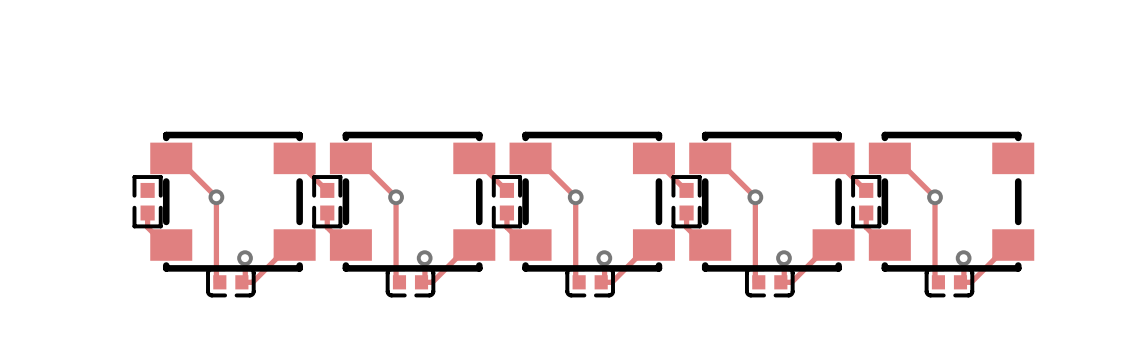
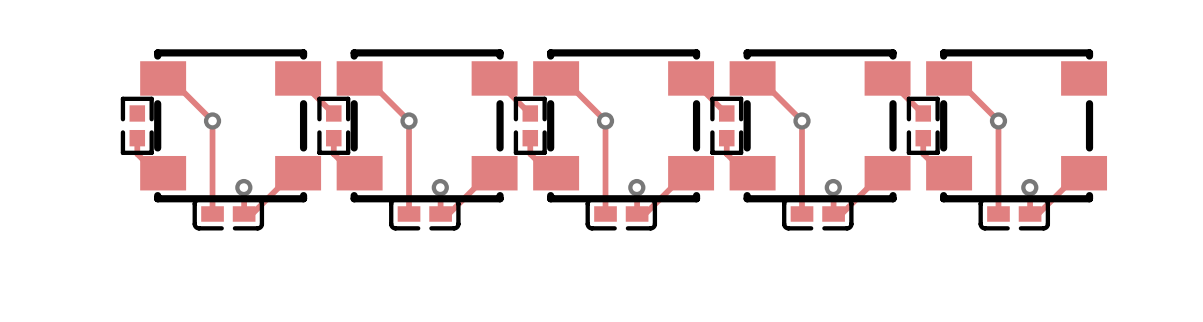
part footprint: [206, 267, 256, 298] -> [192, 197, 265, 231]
part footprint: [385, 267, 436, 298] -> [389, 197, 461, 231]
part footprint: [565, 267, 615, 298] -> [585, 197, 658, 231]
part footprint: [744, 267, 795, 298] -> [782, 197, 854, 231]
part footprint: [924, 267, 975, 298] -> [978, 197, 1051, 231]

